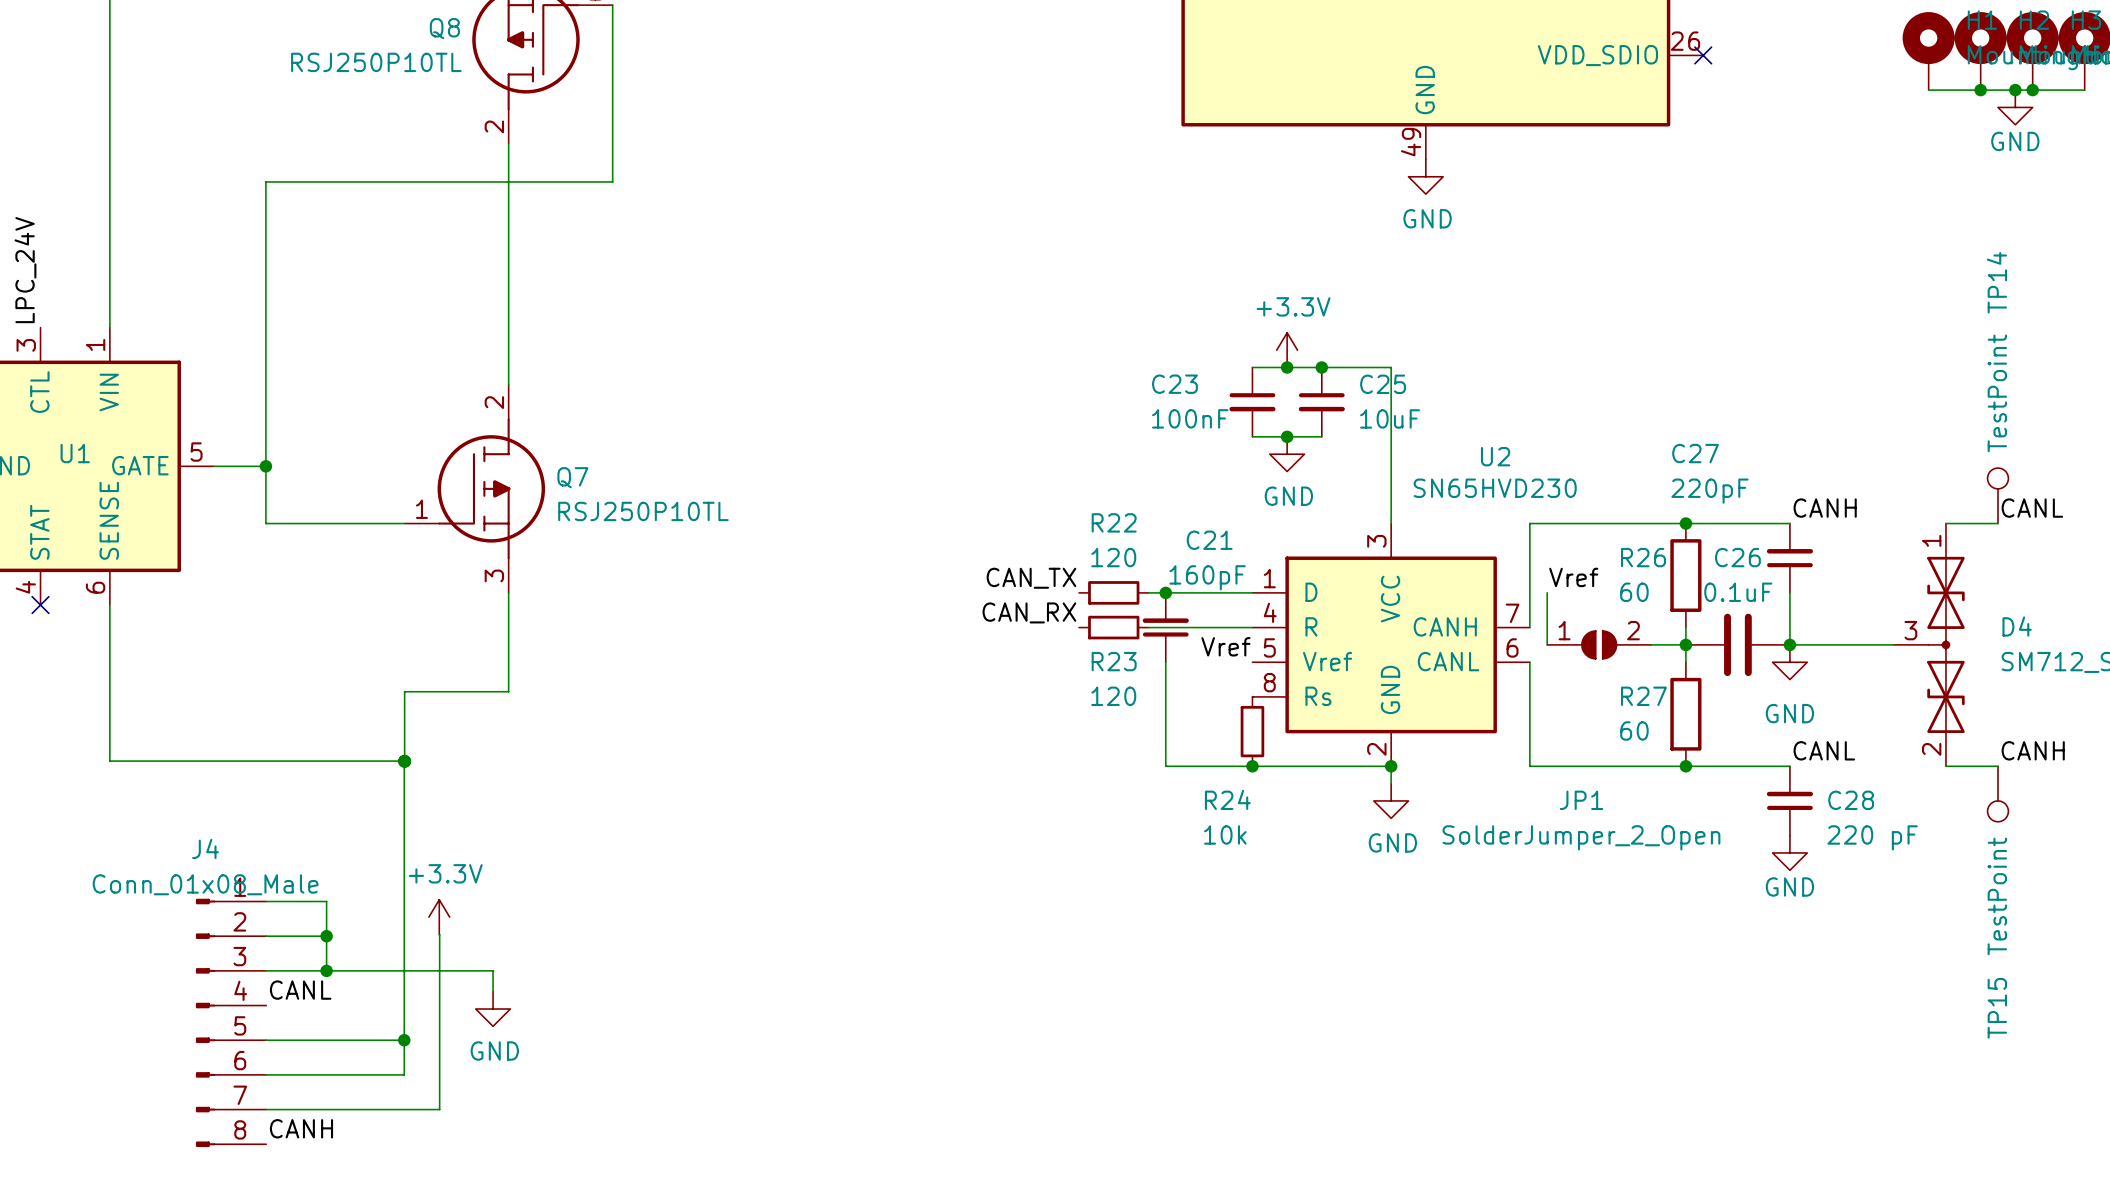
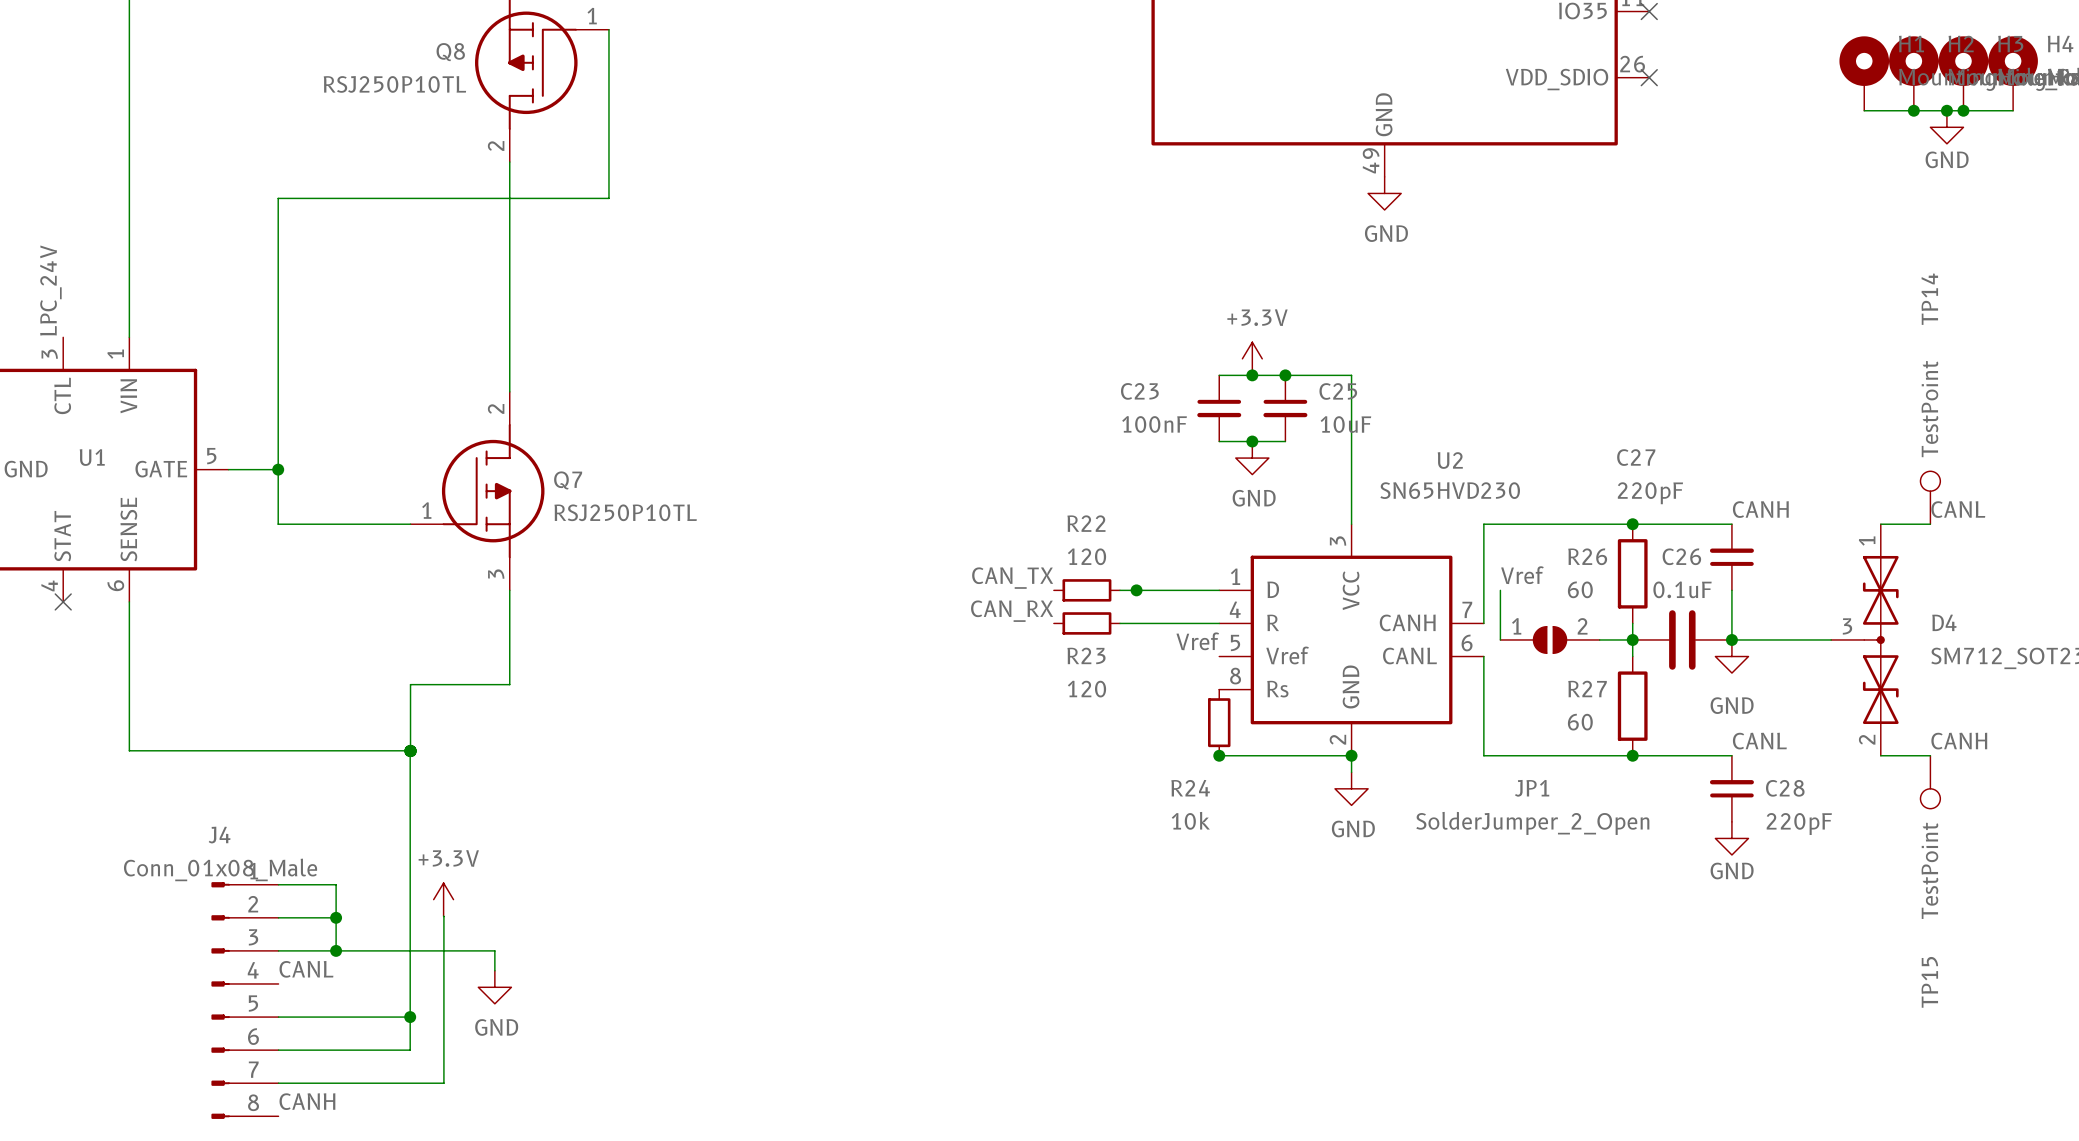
C21: 160pF (1165, 627) -> none
wire: (1165, 662) (1165, 766) (1252, 766) -> none
C28 value: 220 pF (1872, 837) -> 220pF (1799, 824)

